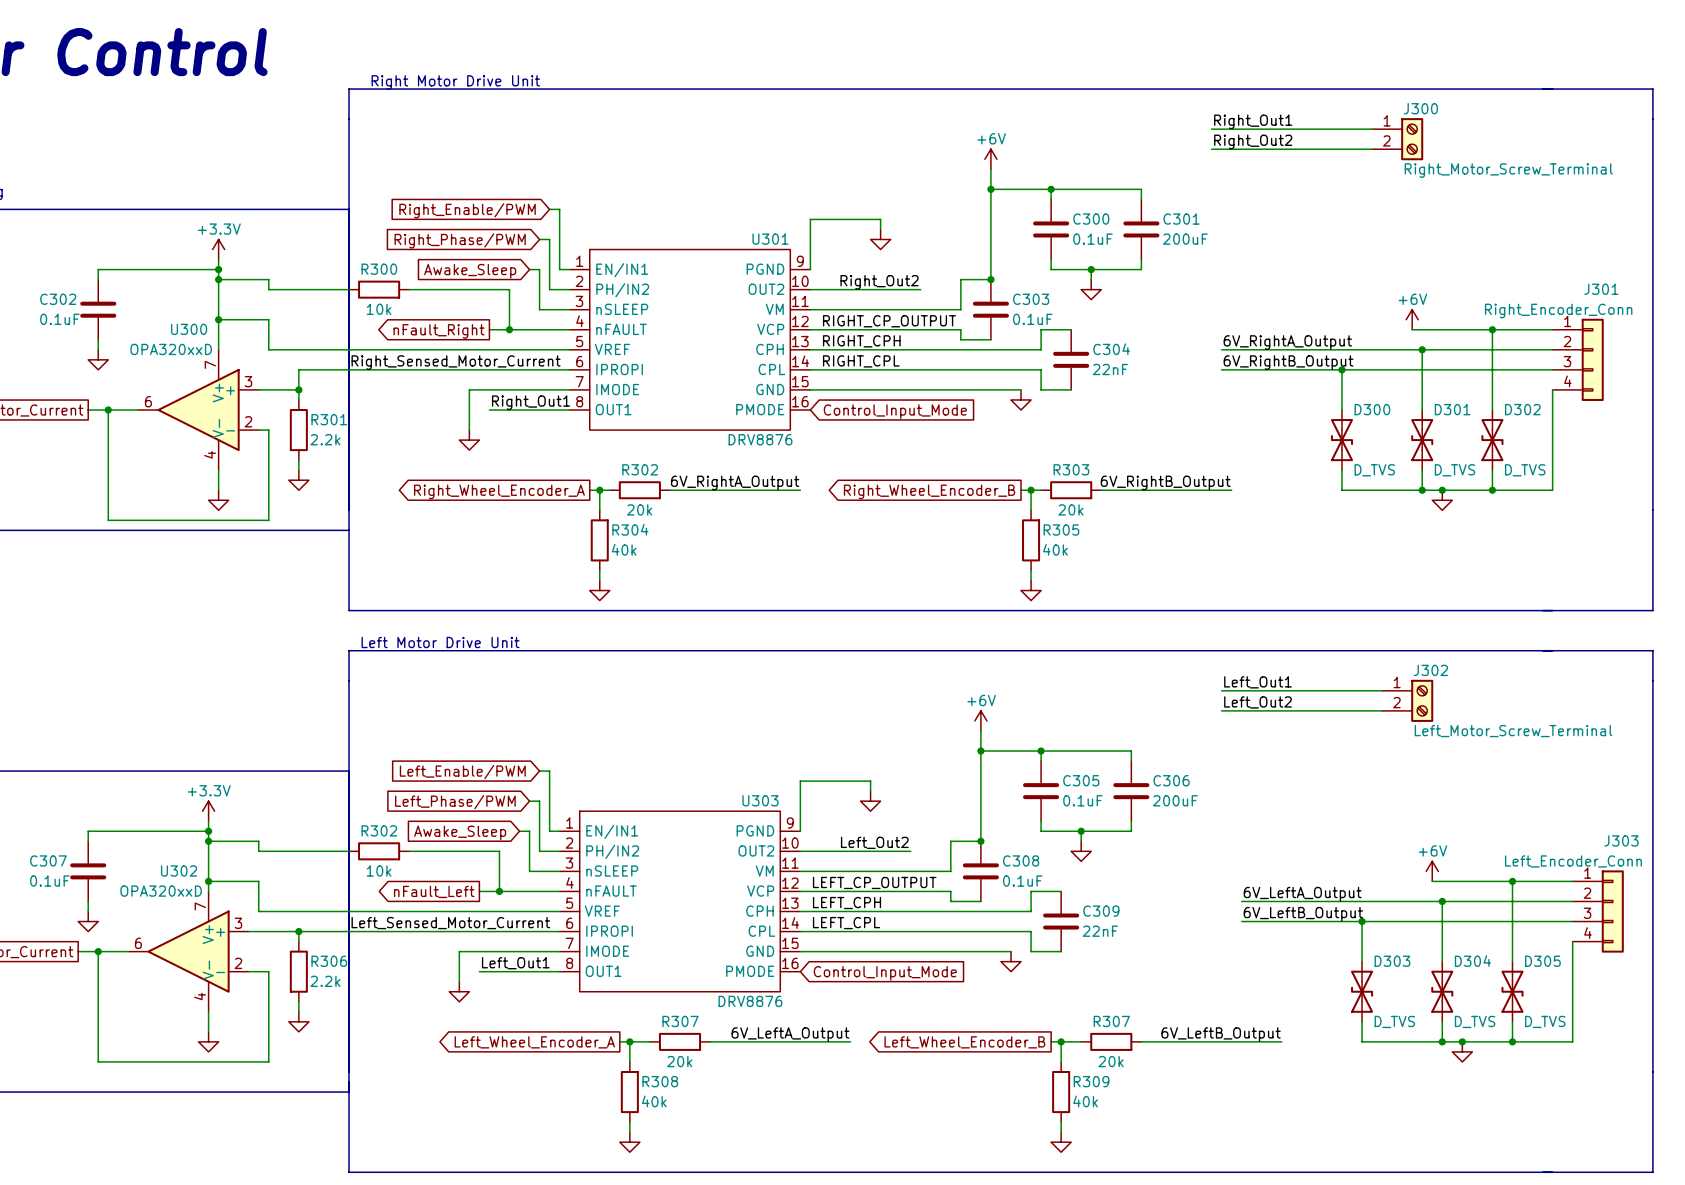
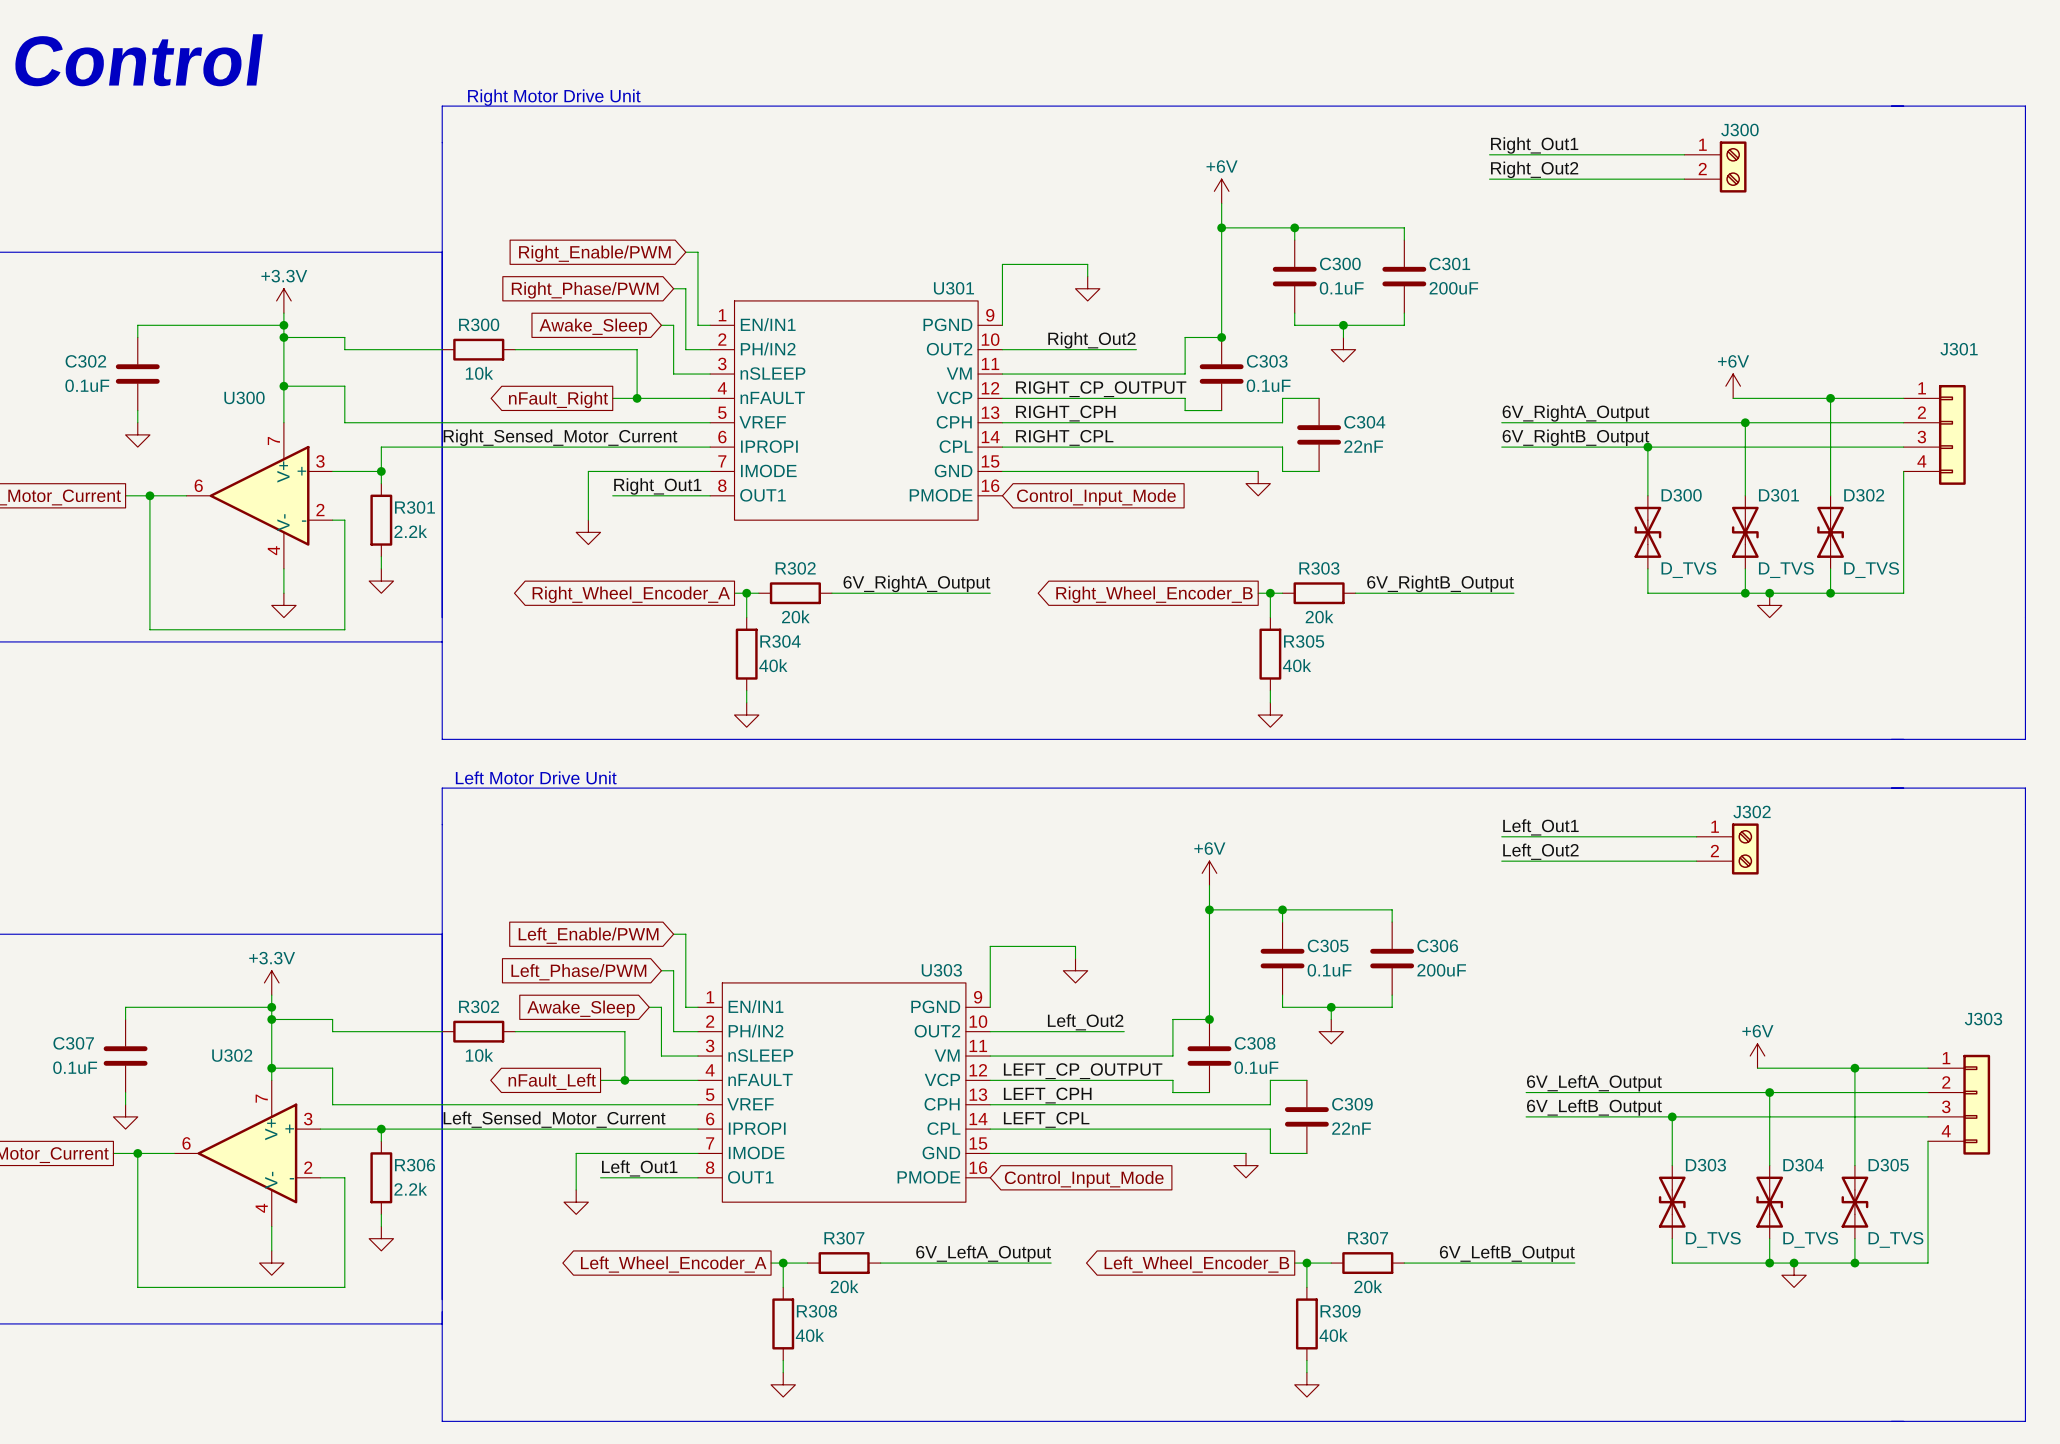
J300 value: Right_Motor_Screw_Terminal (1508, 170) -> none
J301 value: Right_Encoder_Conn (1558, 310) -> none
U300 value: OPA320xxD (171, 349) -> none
U301 value: DRV8876 (760, 439) -> none
J302 value: Left_Motor_Screw_Terminal (1513, 731) -> none
J303 value: Left_Encoder_Conn (1573, 861) -> none
U302 value: OPA320xxD (161, 891) -> none
U303 value: DRV8876 (750, 1001) -> none

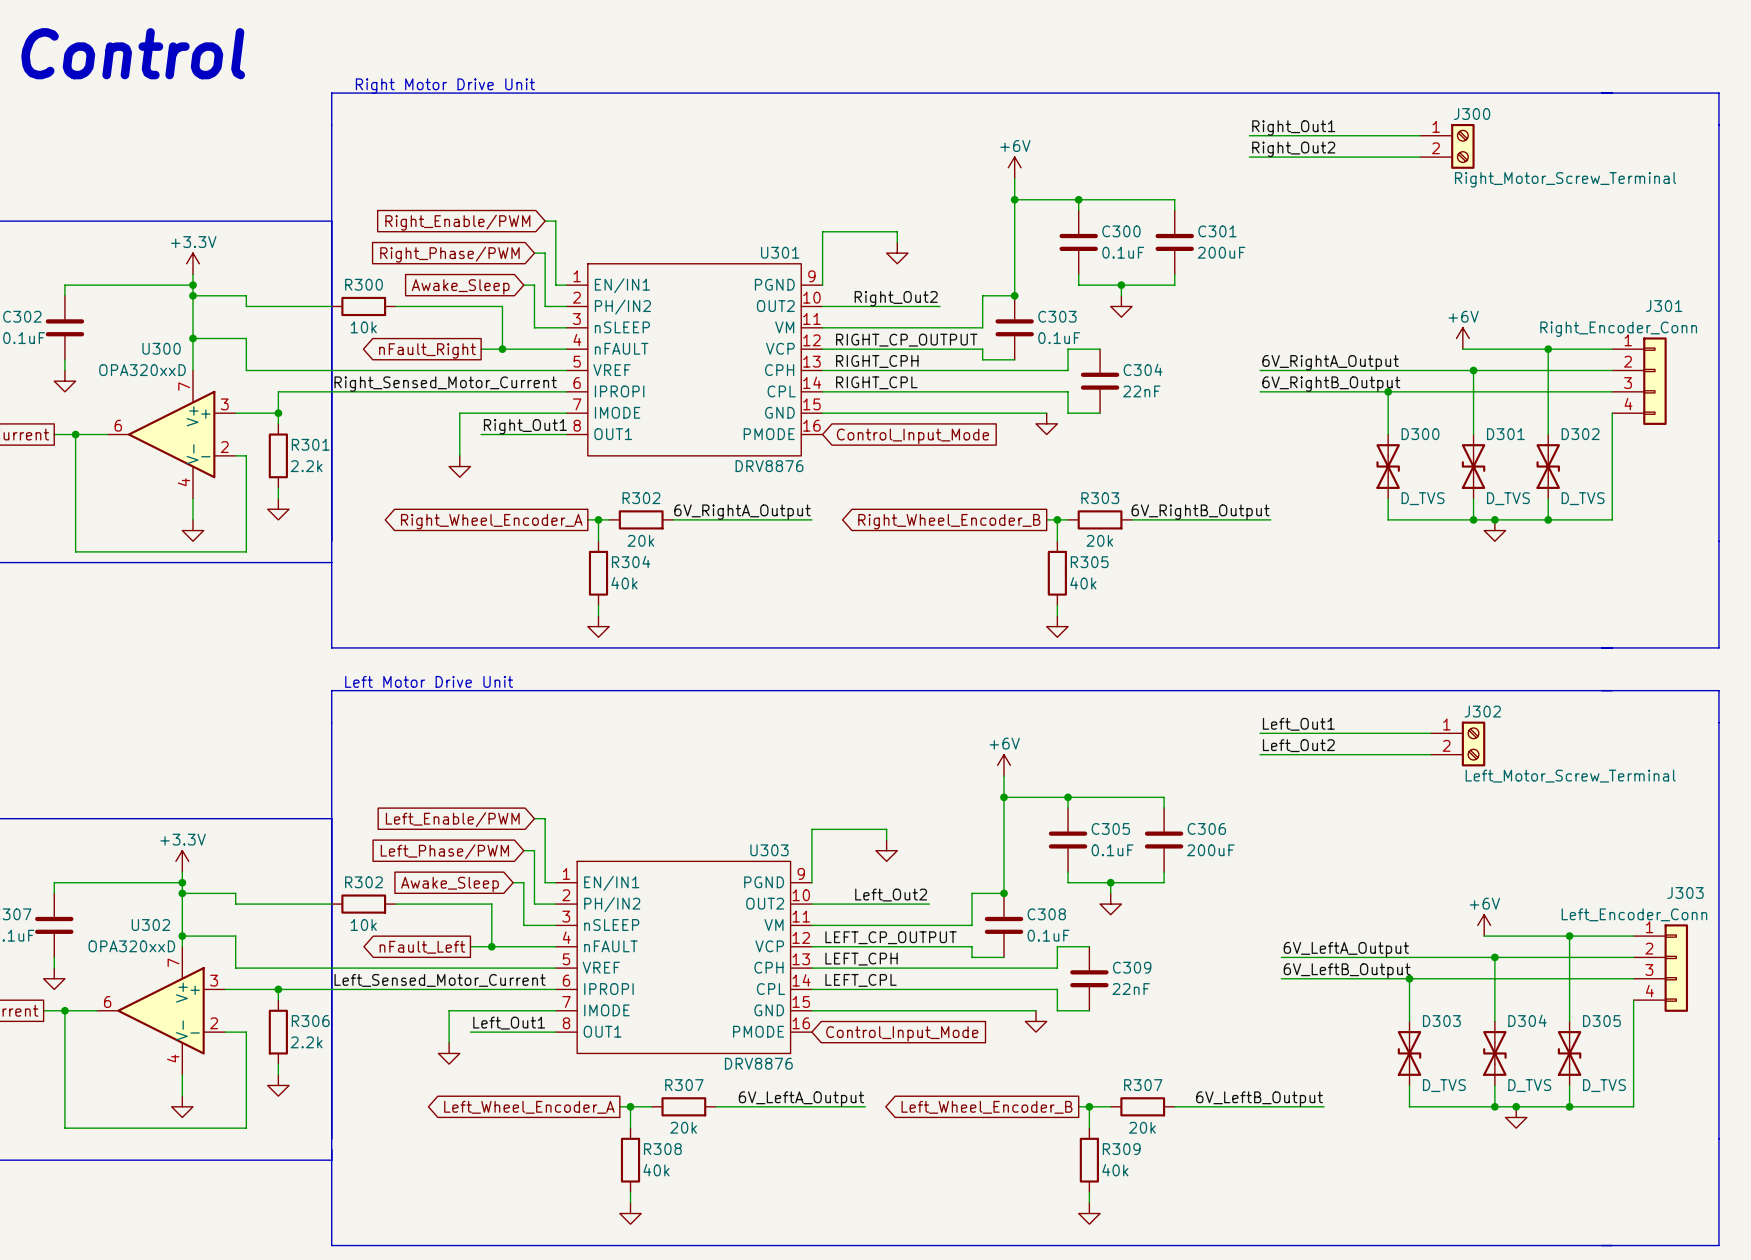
J300 value: none -> Right_Motor_Screw_Terminal (1565, 179)
J301 value: none -> Right_Encoder_Conn (1618, 329)
U300 value: none -> OPA320xxD (142, 370)
U301 value: none -> DRV8876 (769, 466)
J302 value: none -> Left_Motor_Screw_Terminal (1570, 776)
J303 value: none -> Left_Encoder_Conn (1634, 914)
U302 value: none -> OPA320xxD (131, 946)
U303 value: none -> DRV8876 (758, 1063)

